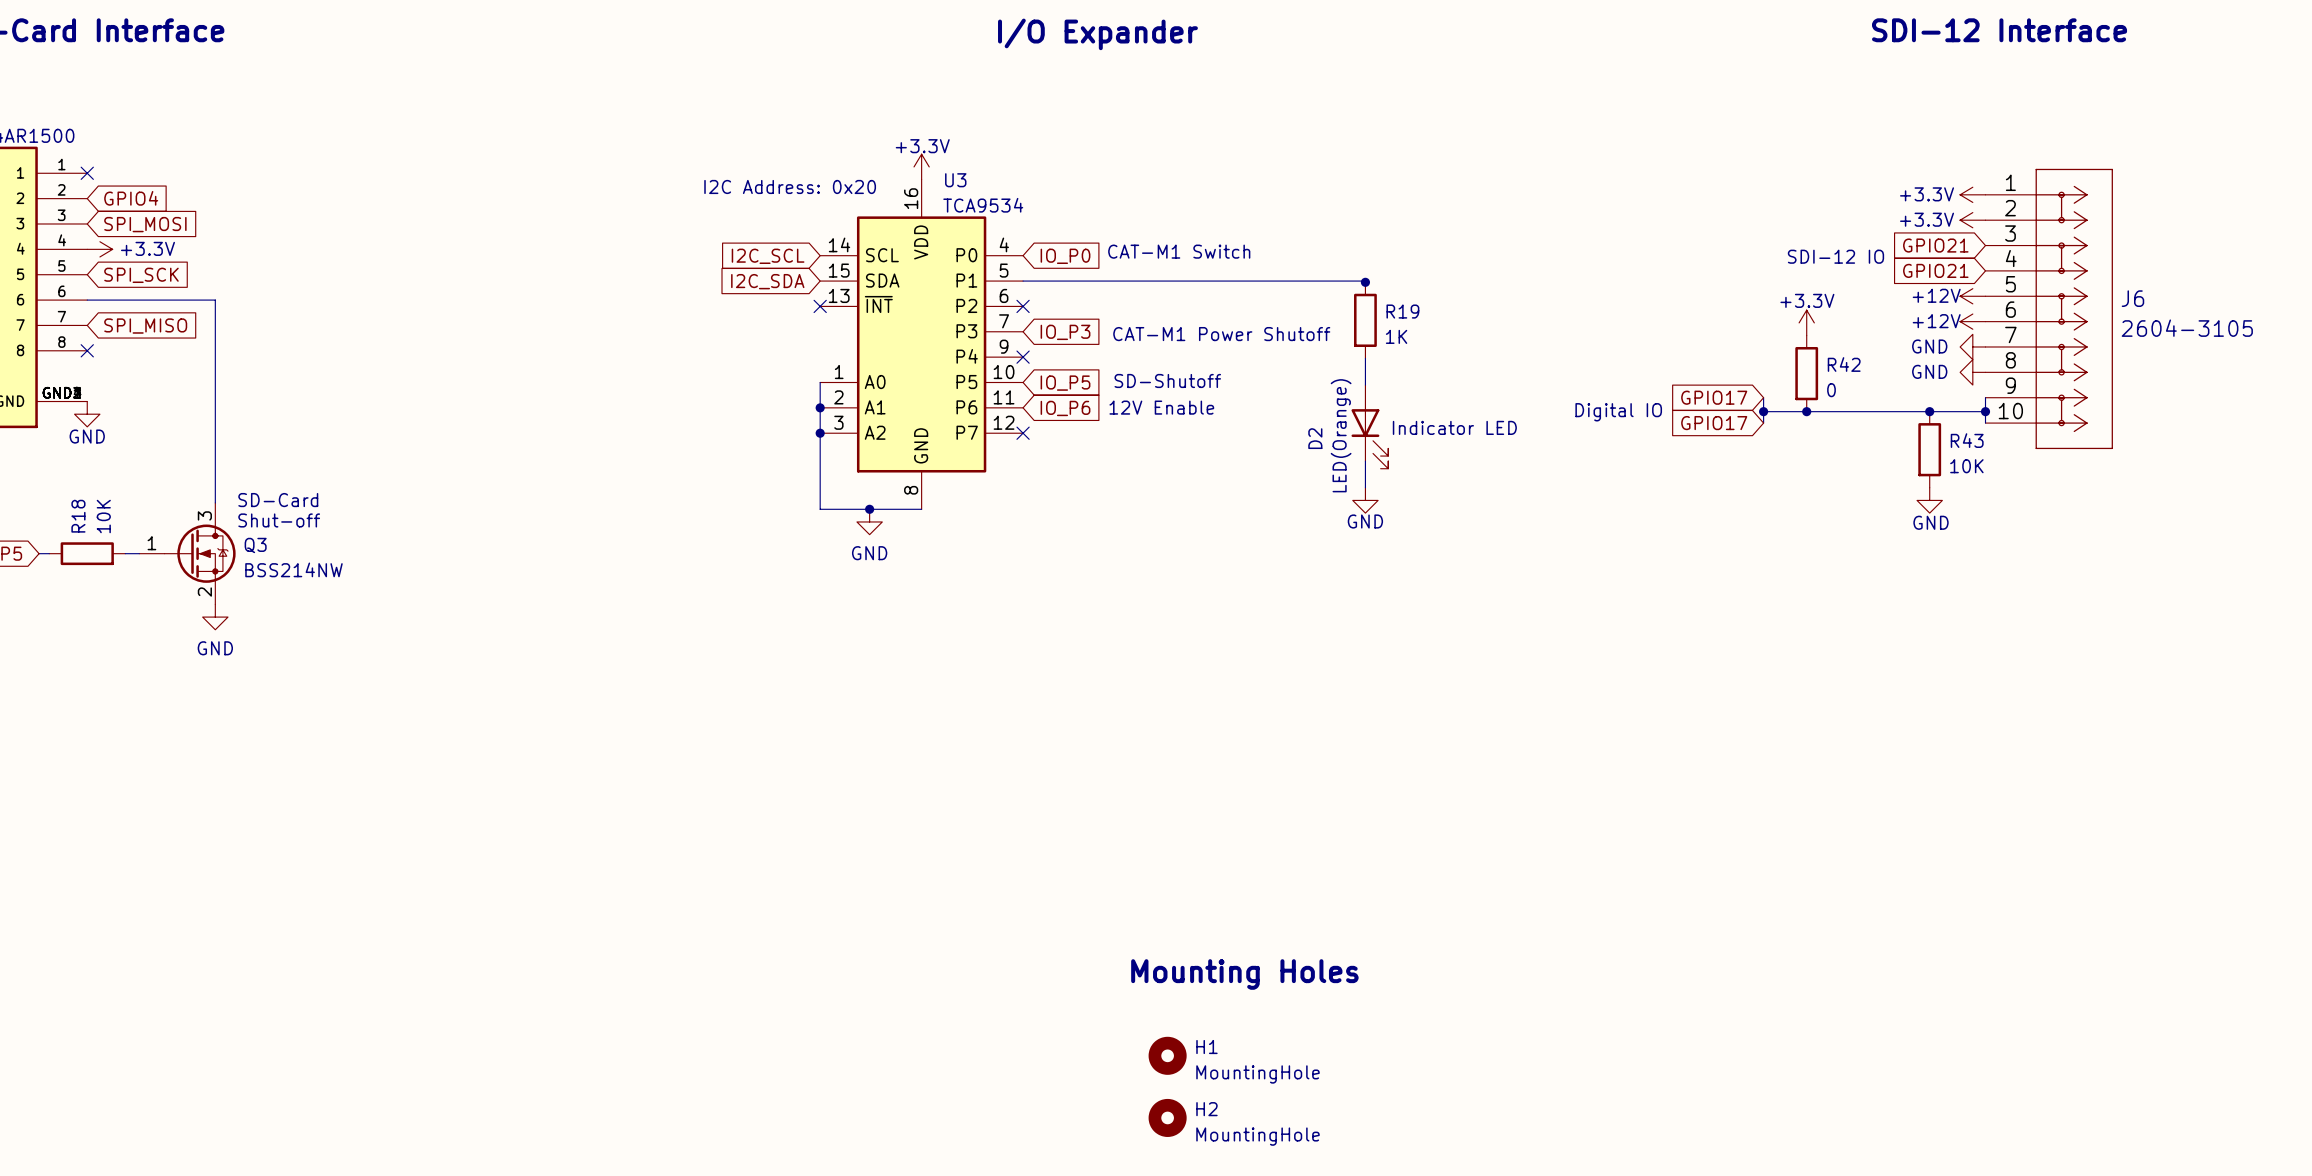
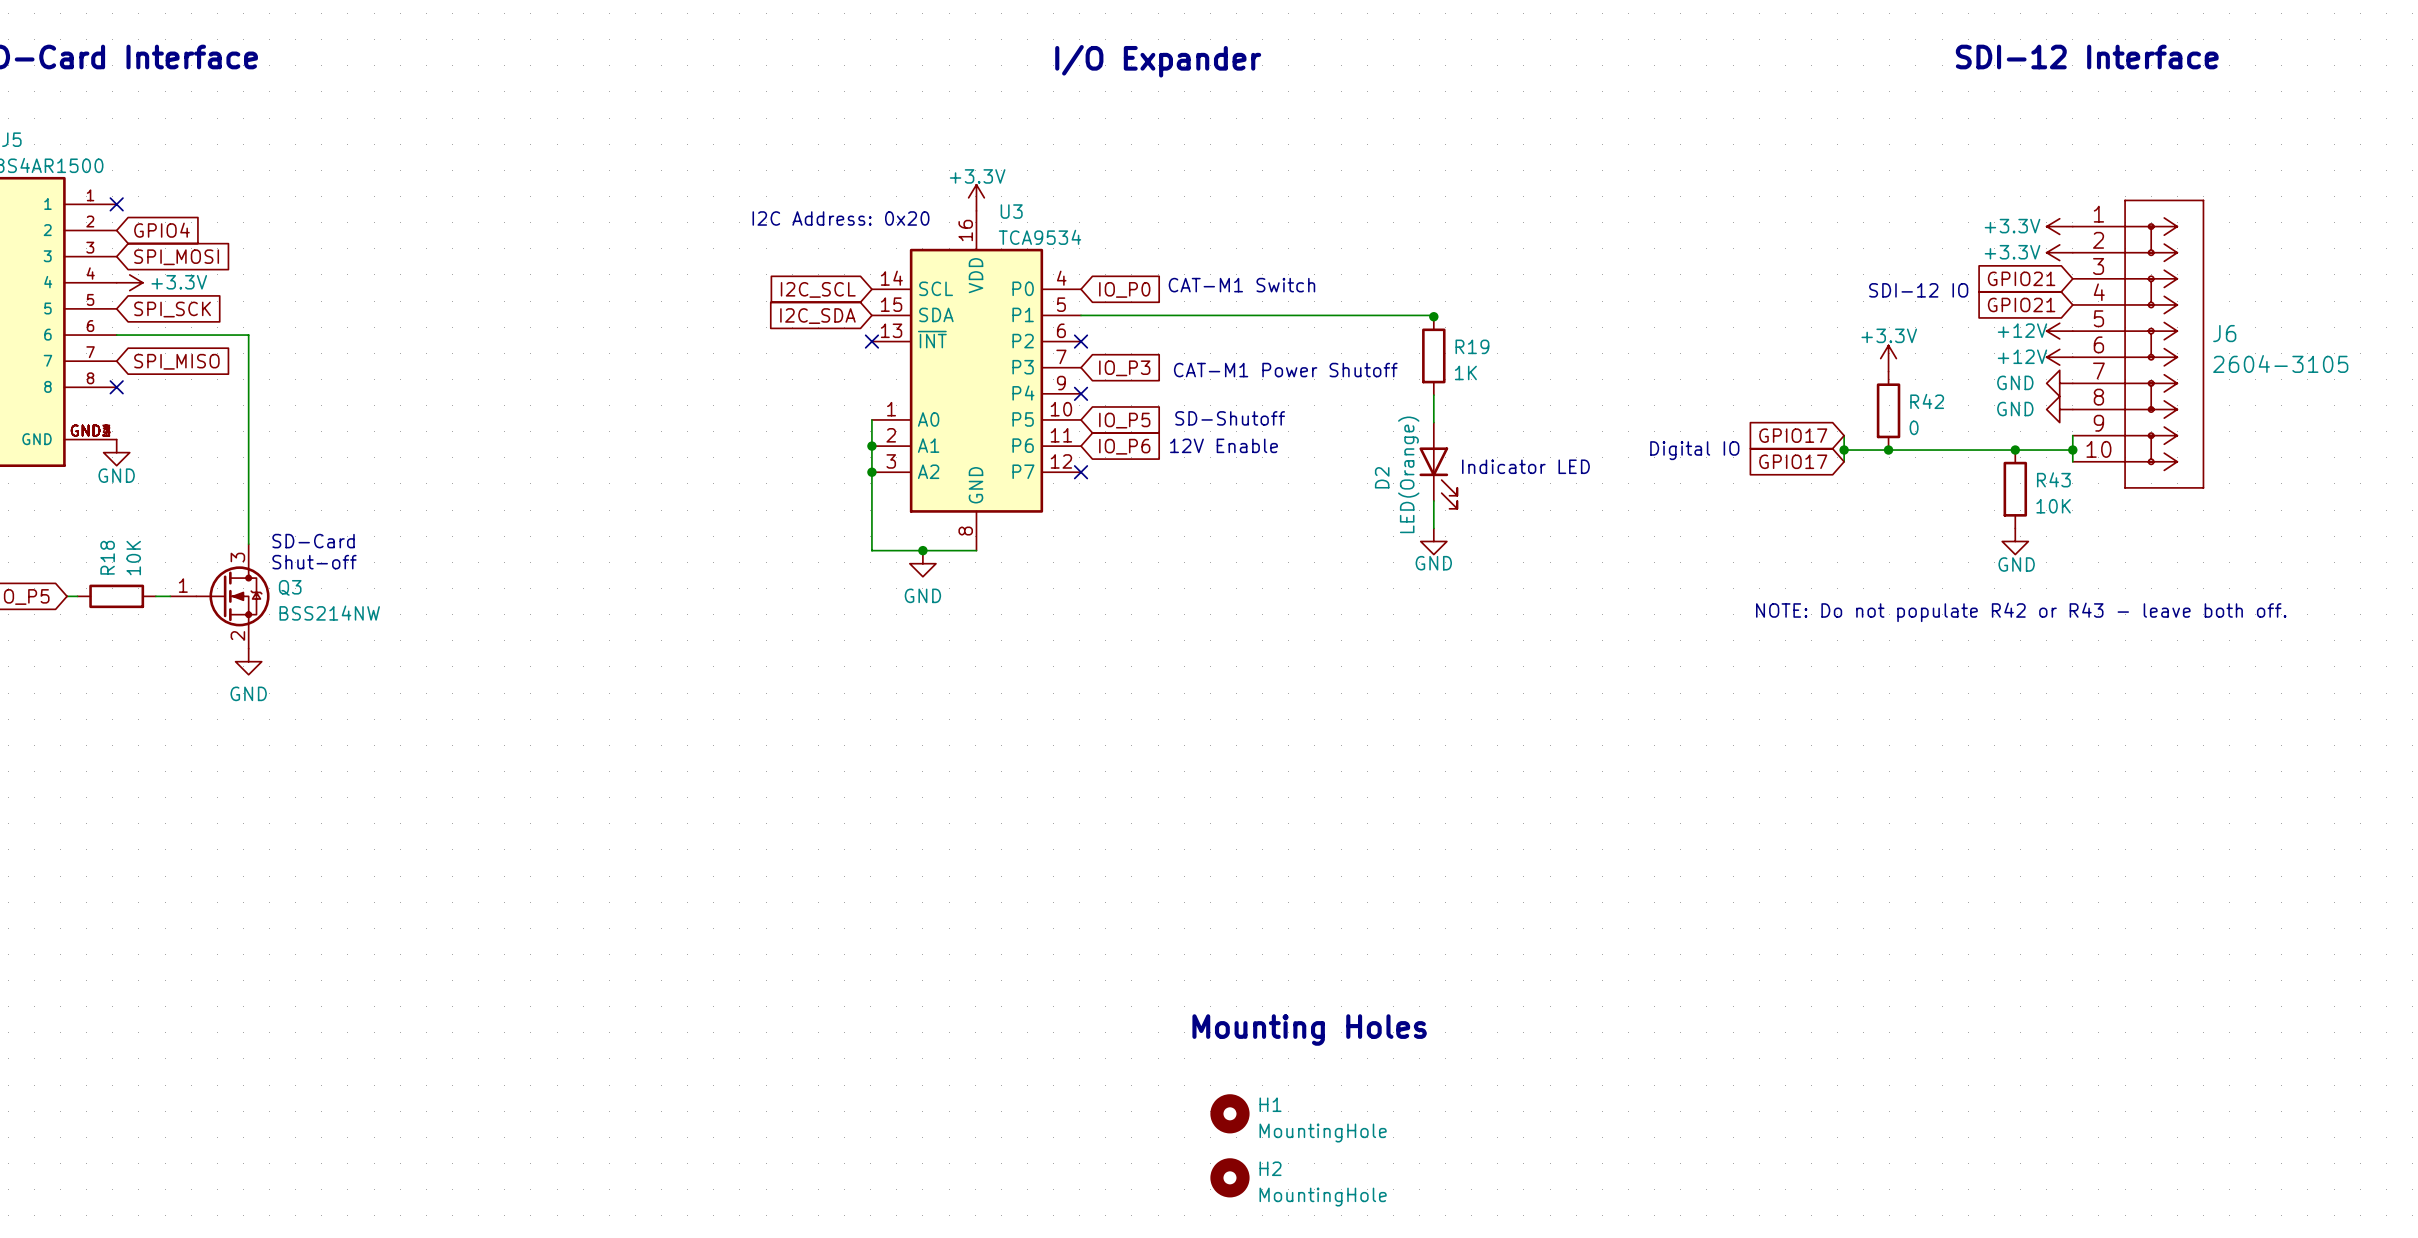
text: none -> NOTE: Do not populate R42 or R43 - leave both off. (2021, 612)

